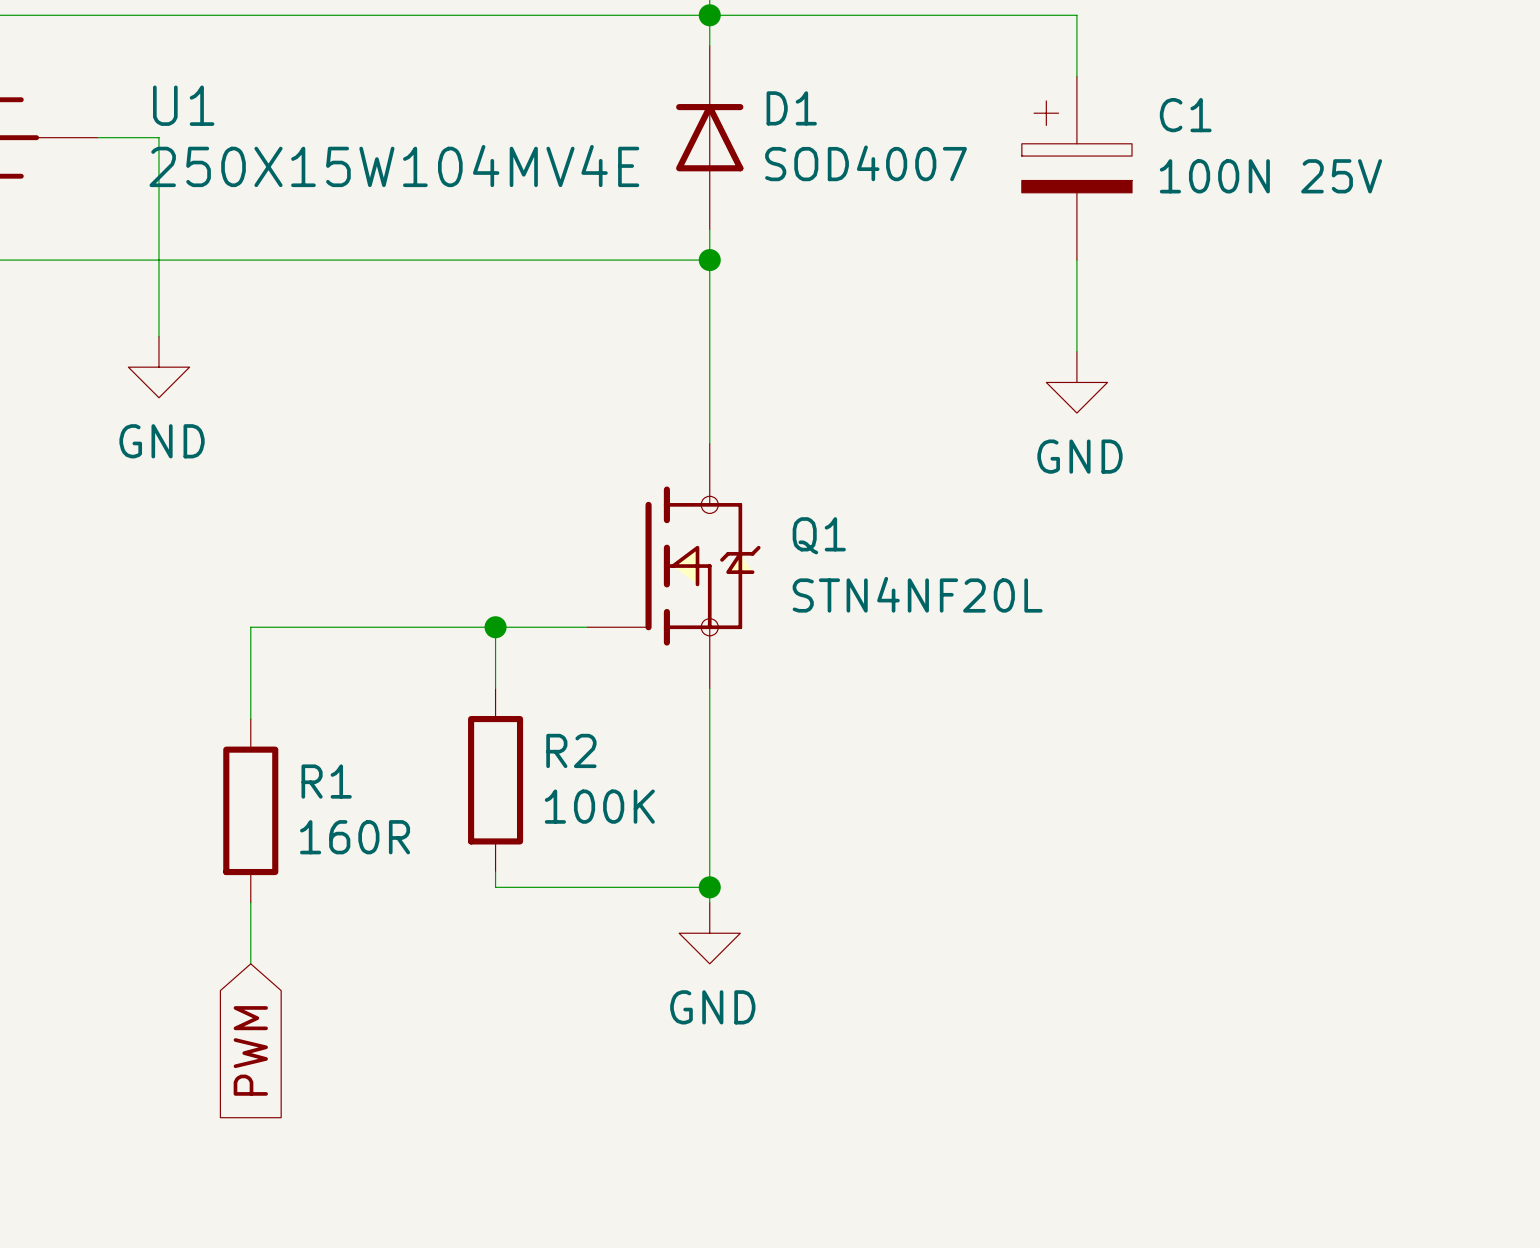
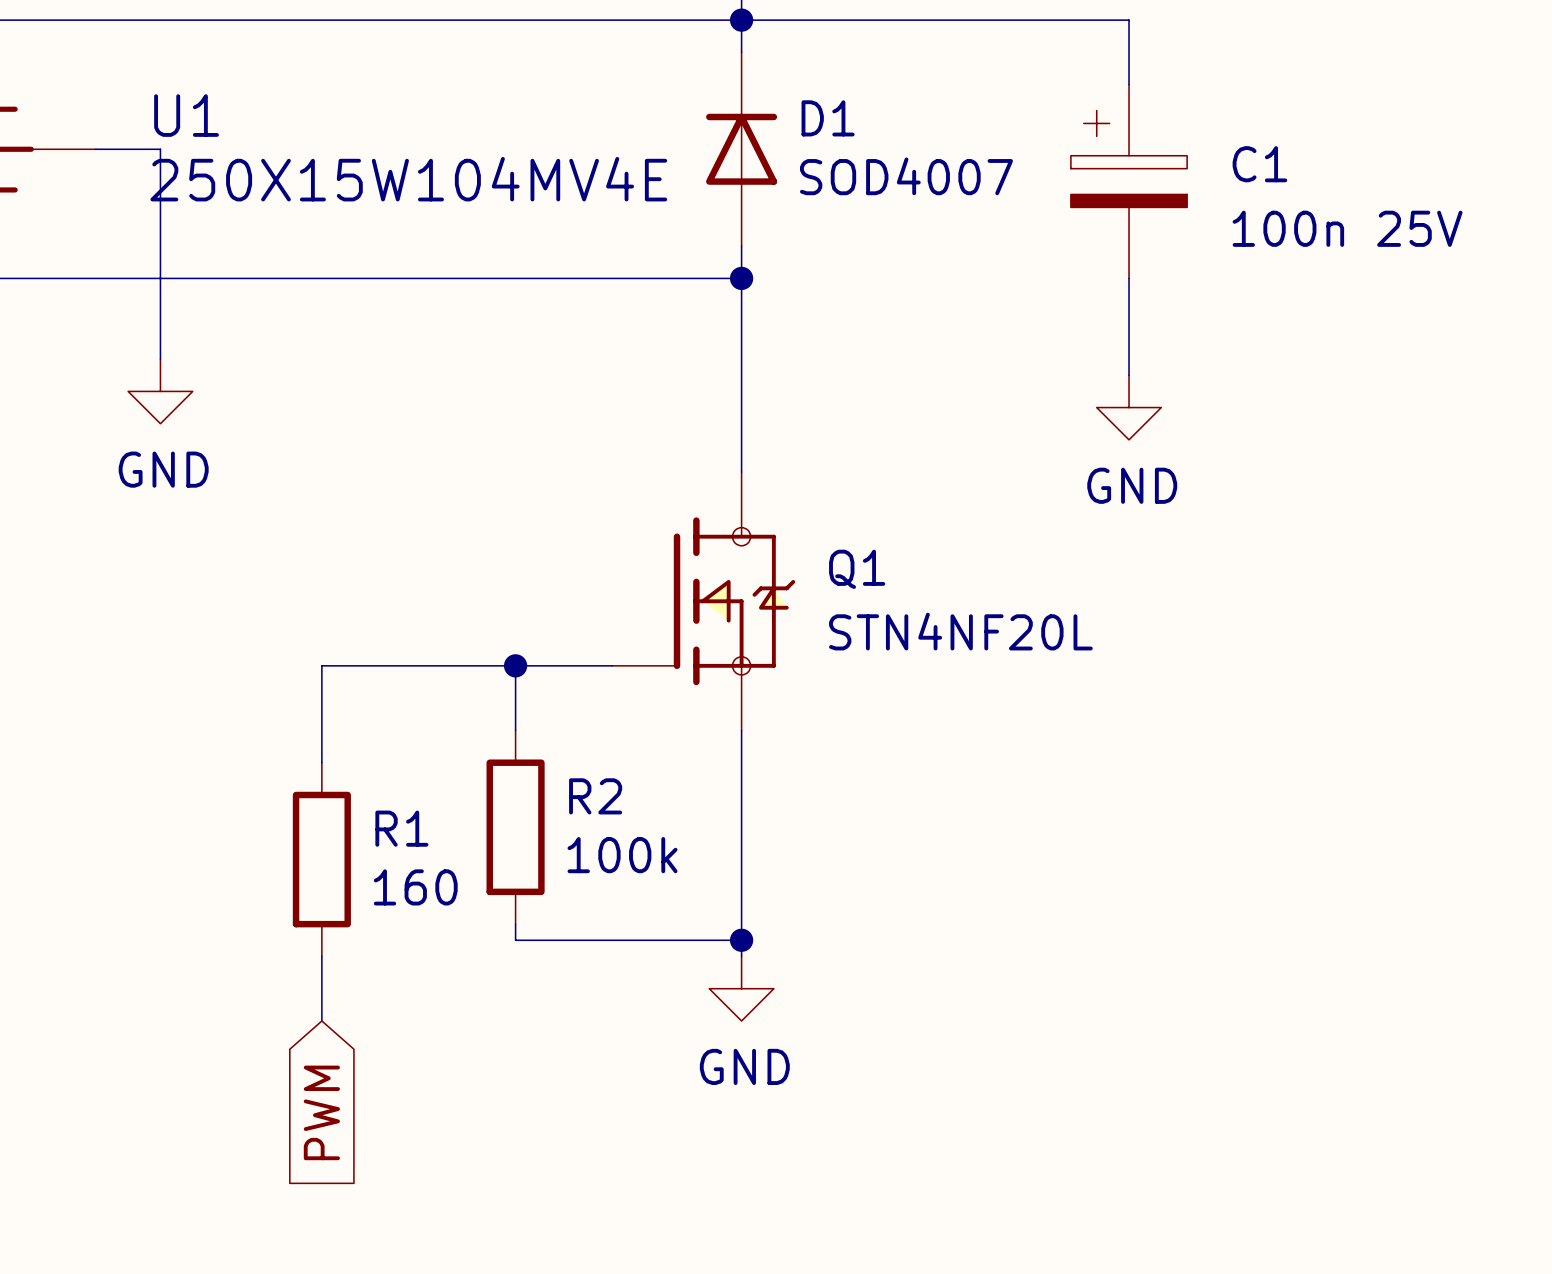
C1 name position: C1 (1185, 115) -> C1 (1259, 164)
C1 value: 100N 25V (1270, 176) -> 100n 25V (1347, 228)
wire: (311, 627) (250, 627) (250, 719) -> (321, 665) (321, 762)
R2 value: 100K (599, 806) -> 100k (622, 855)
R1 position: (250, 810) -> (321, 859)
R1 value: 160R (355, 837) -> 160 (415, 887)
wire: (250, 902) (250, 963) -> (321, 956) (321, 1020)
global label position: PWM (250, 1050) -> PWM (321, 1112)

